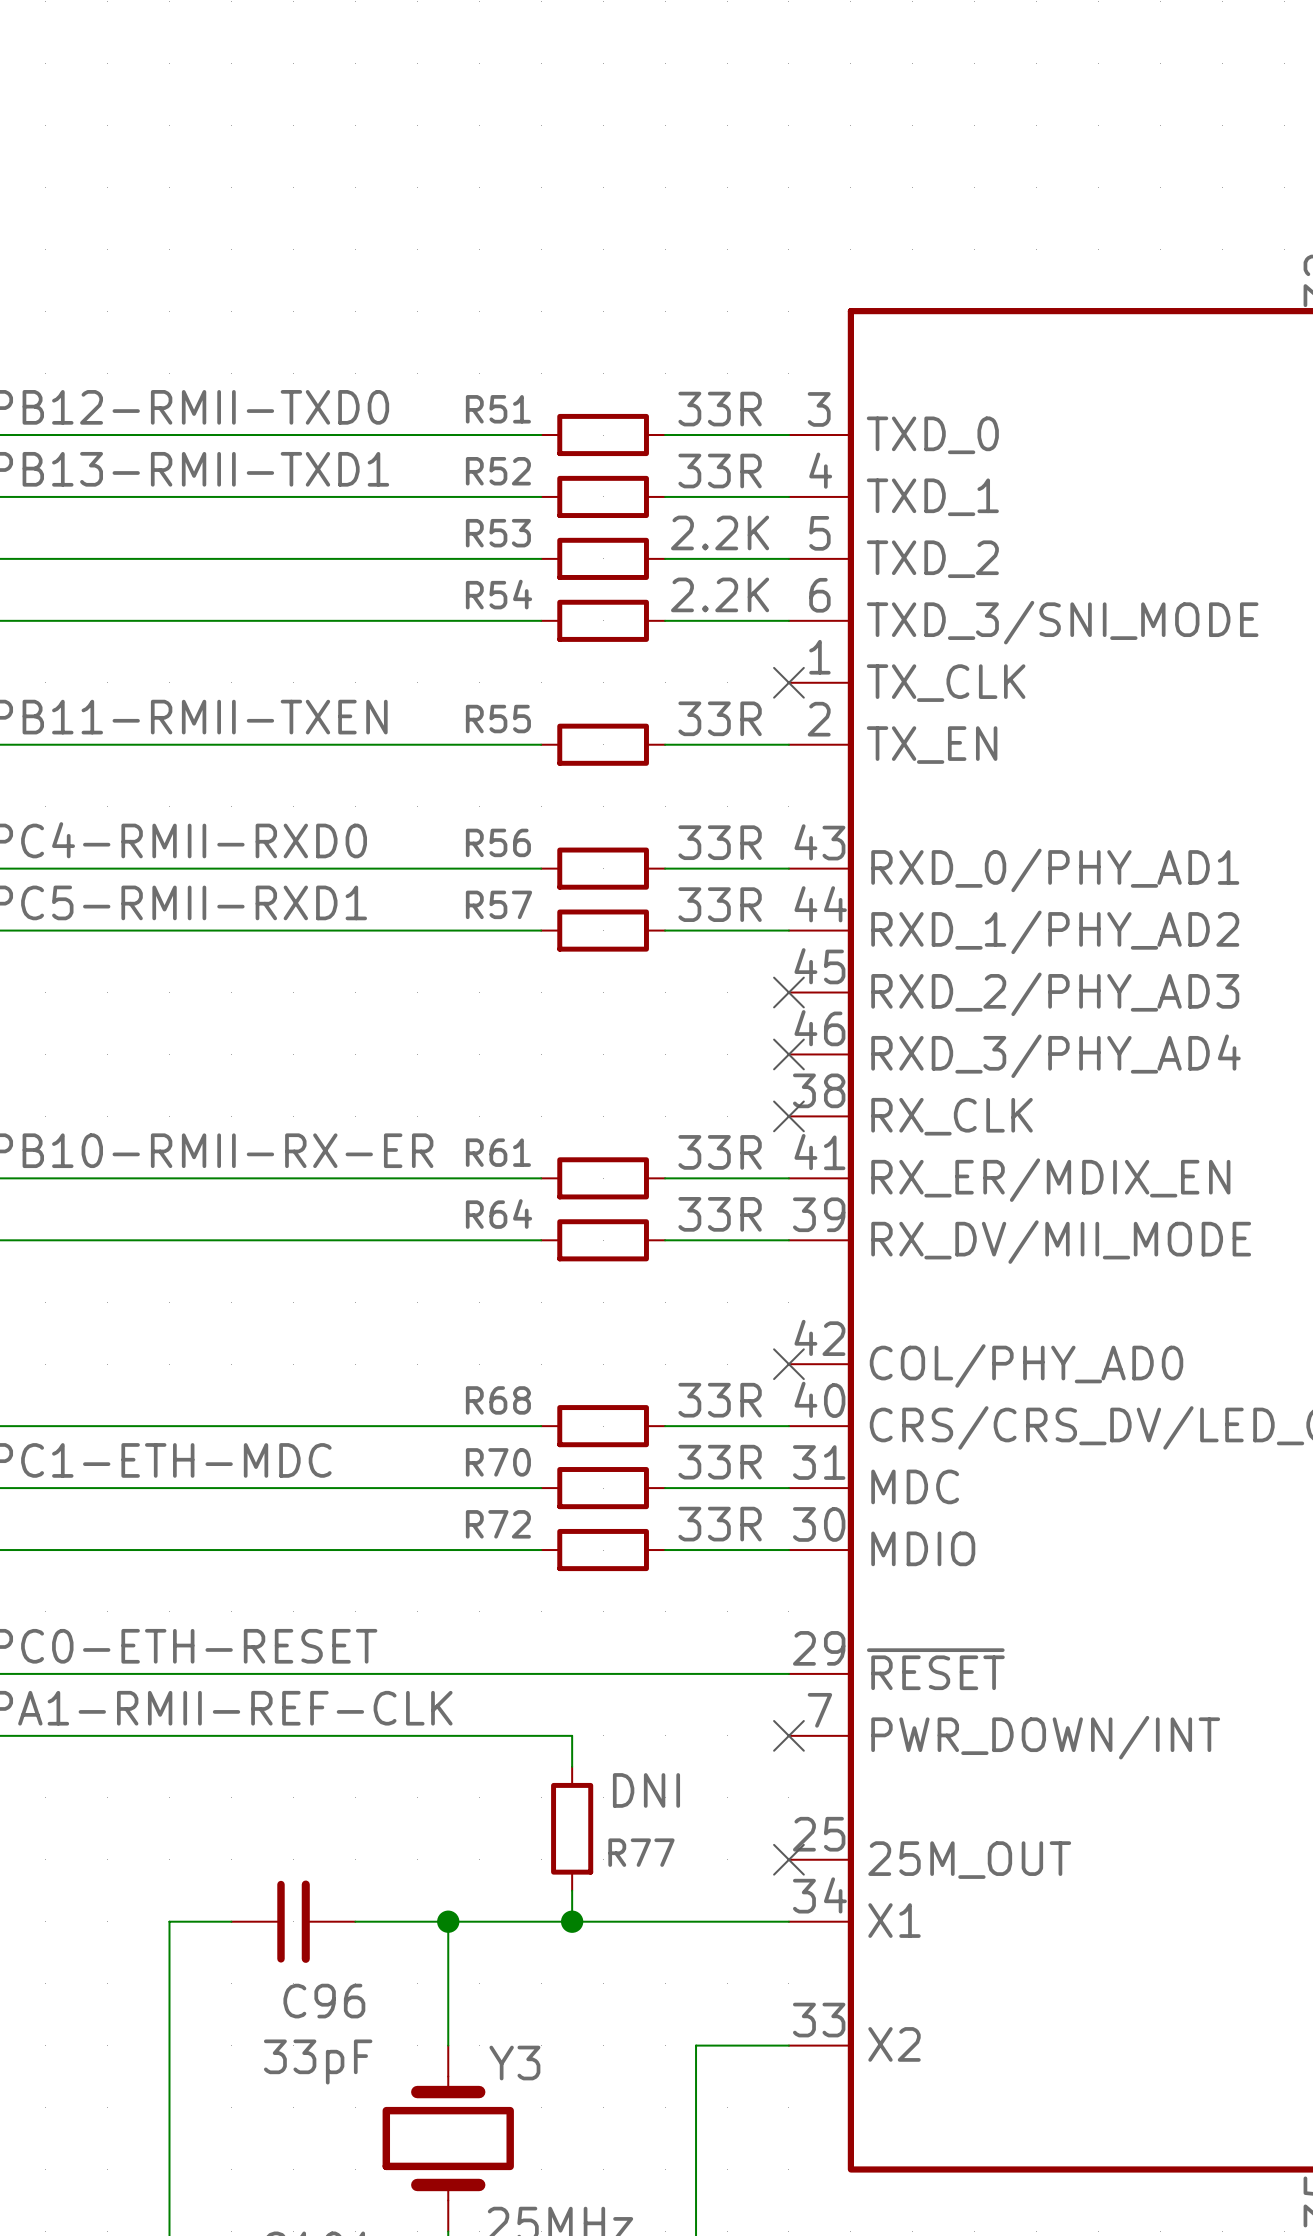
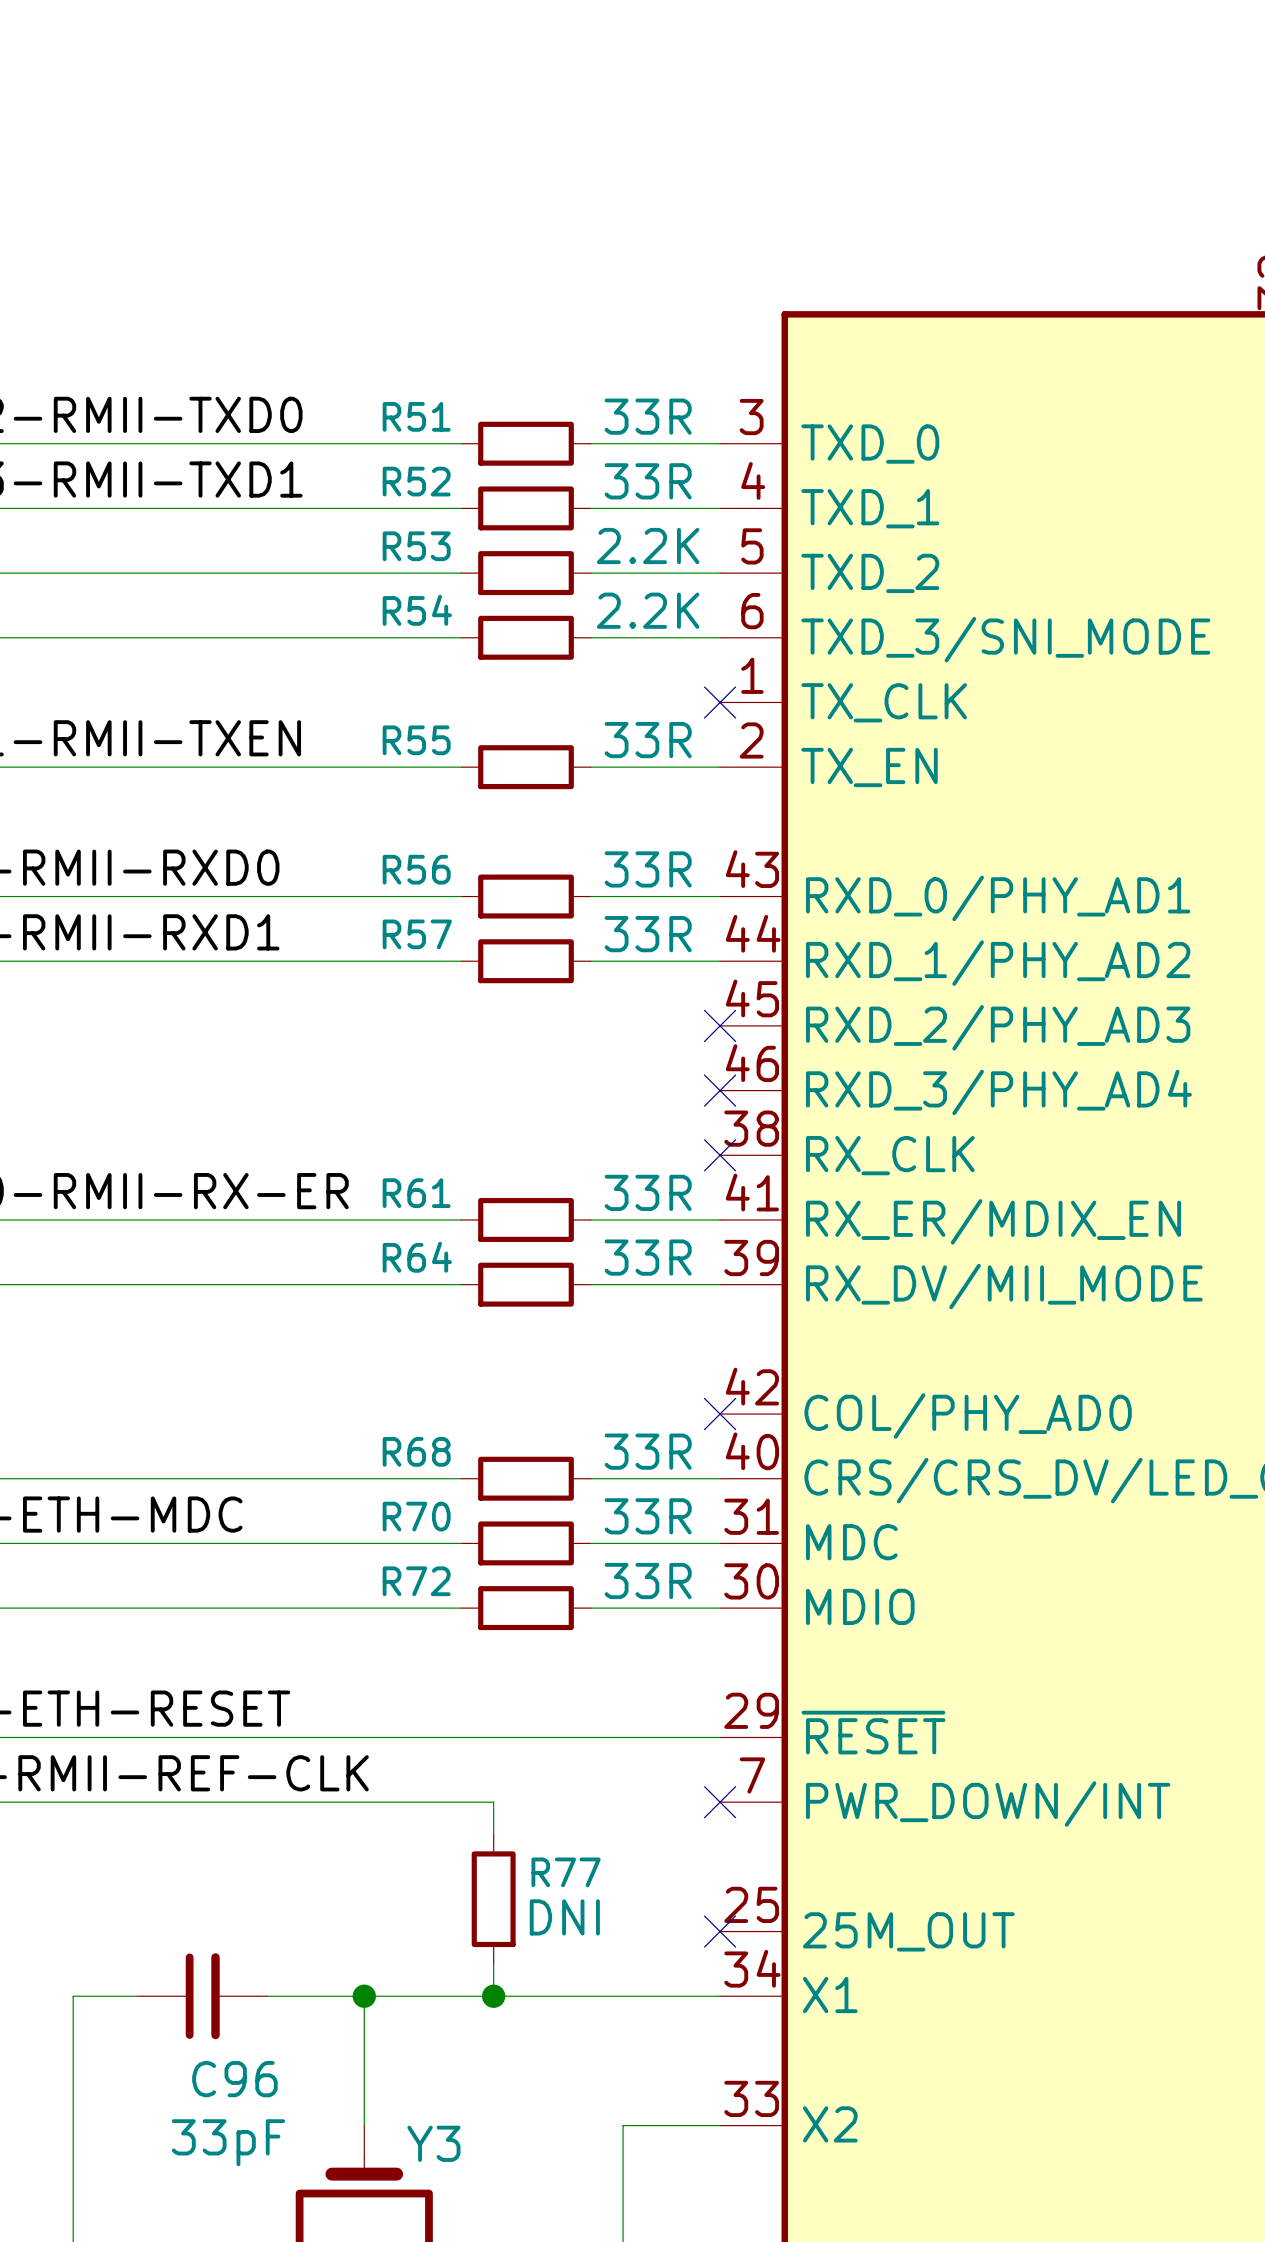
R77 value position: DNI (646, 1790) -> DNI (564, 1917)
R77 name position: R77 (641, 1852) -> R77 (566, 1872)

